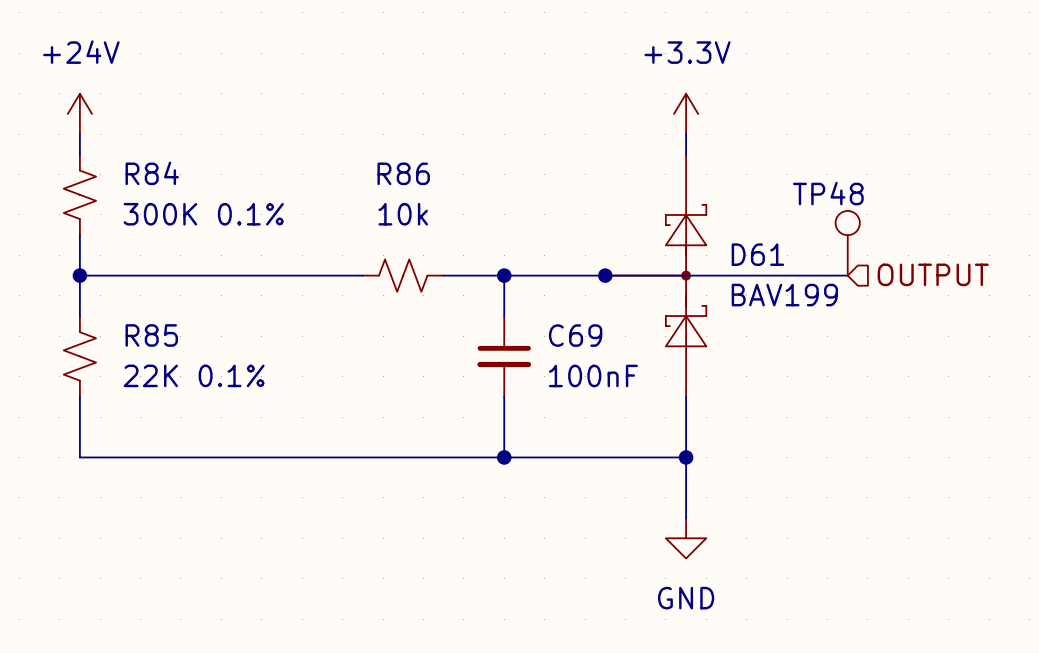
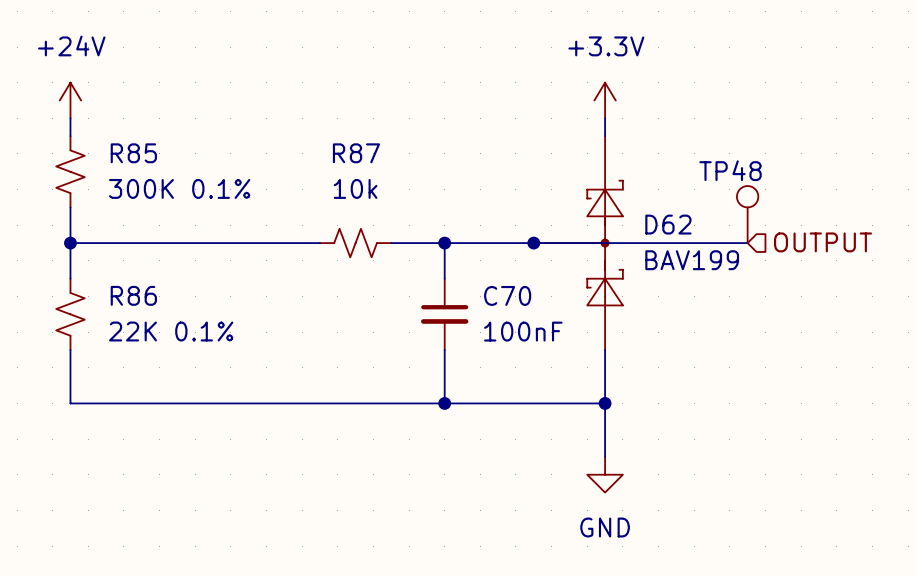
R84 name: R84 (152, 173) -> R85 (133, 153)
R86 name: R86 (403, 173) -> R87 (356, 153)
D61 name: D61 (757, 254) -> D62 (668, 224)
R85 name: R85 (151, 335) -> R86 (133, 295)
C69 name: C69 (575, 335) -> C70 (507, 295)

